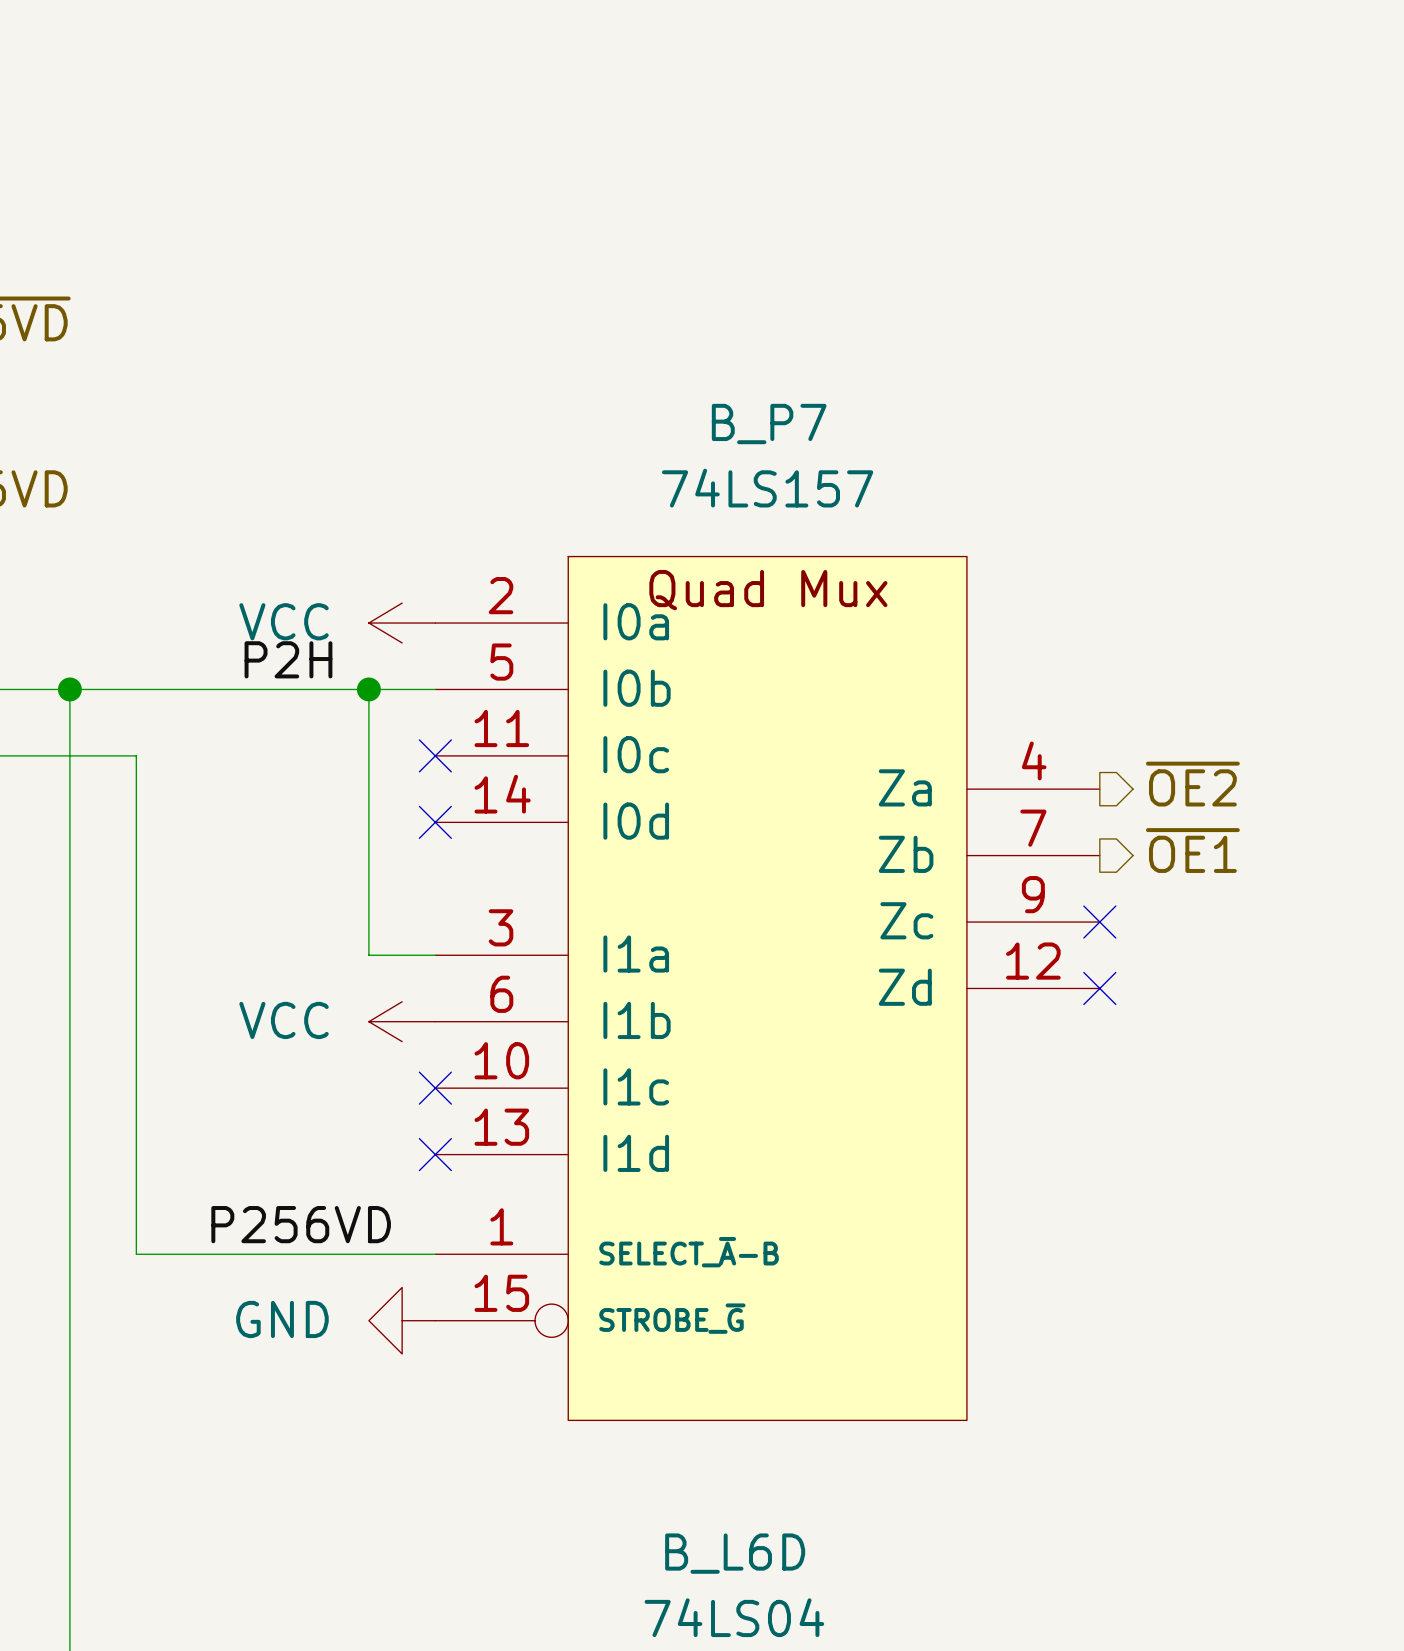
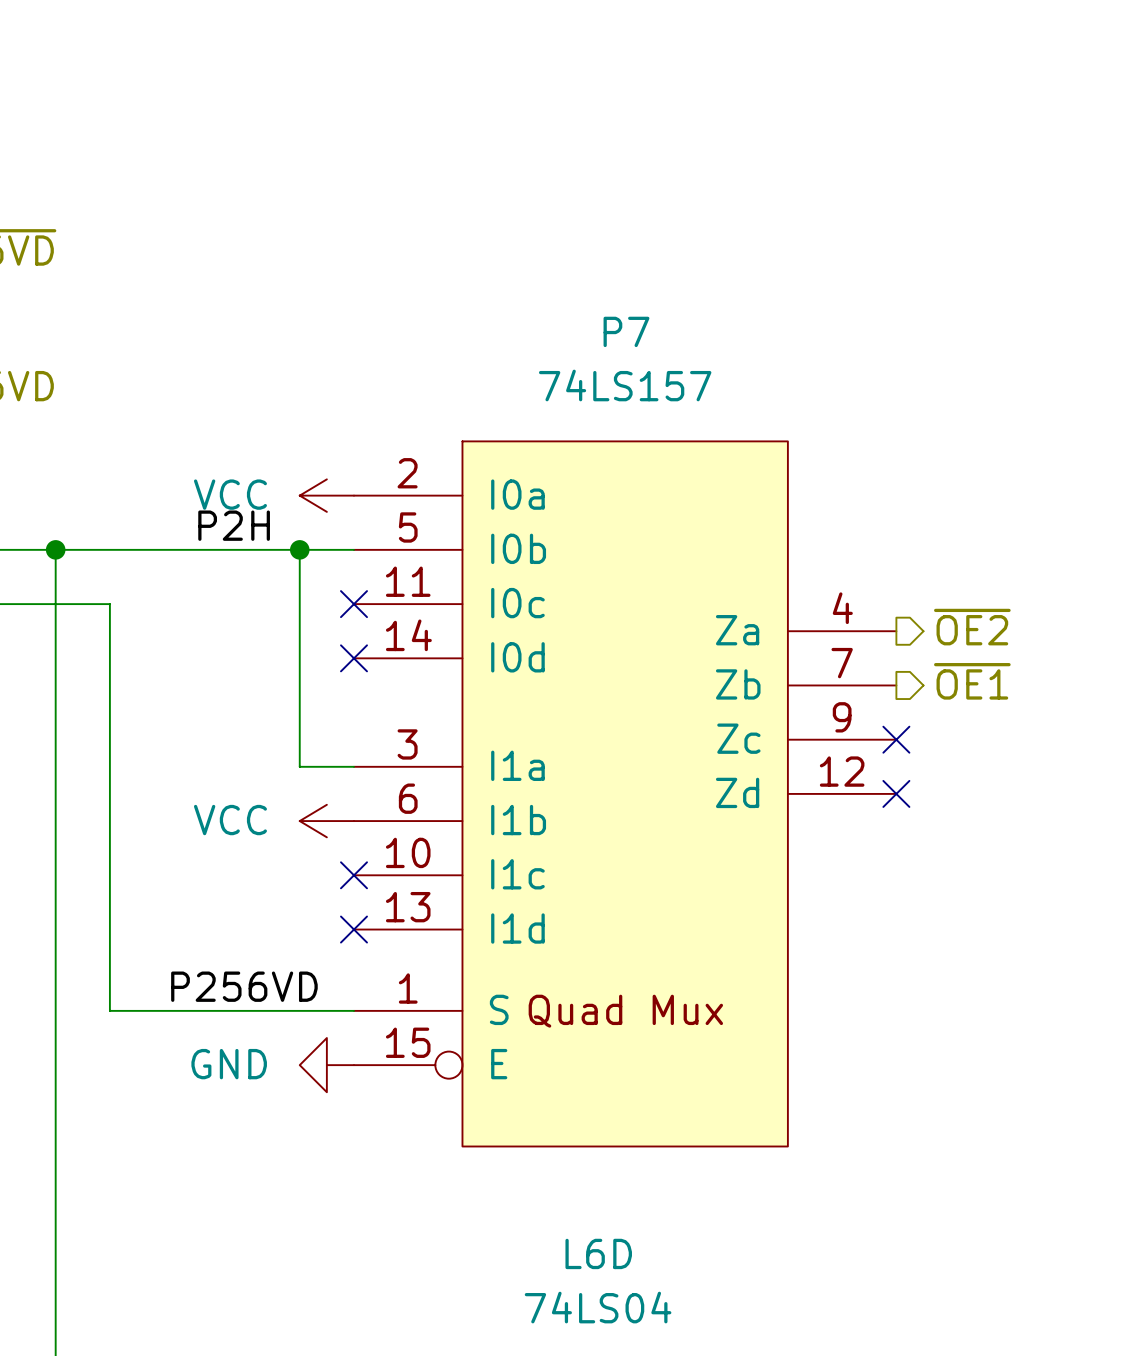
B_P7 name: B_P7 (769, 424) -> P7 (626, 331)
B_P7 text position: Quad Mux (768, 590) -> Quad Mux (625, 1011)
B_P7 pin name: SELECT_~{A}-B (689, 1252) -> S (499, 1009)
B_P7 pin name: STROBE_~{G} (672, 1318) -> E (499, 1064)
B_L6D name: B_L6D (735, 1553) -> L6D (598, 1253)

